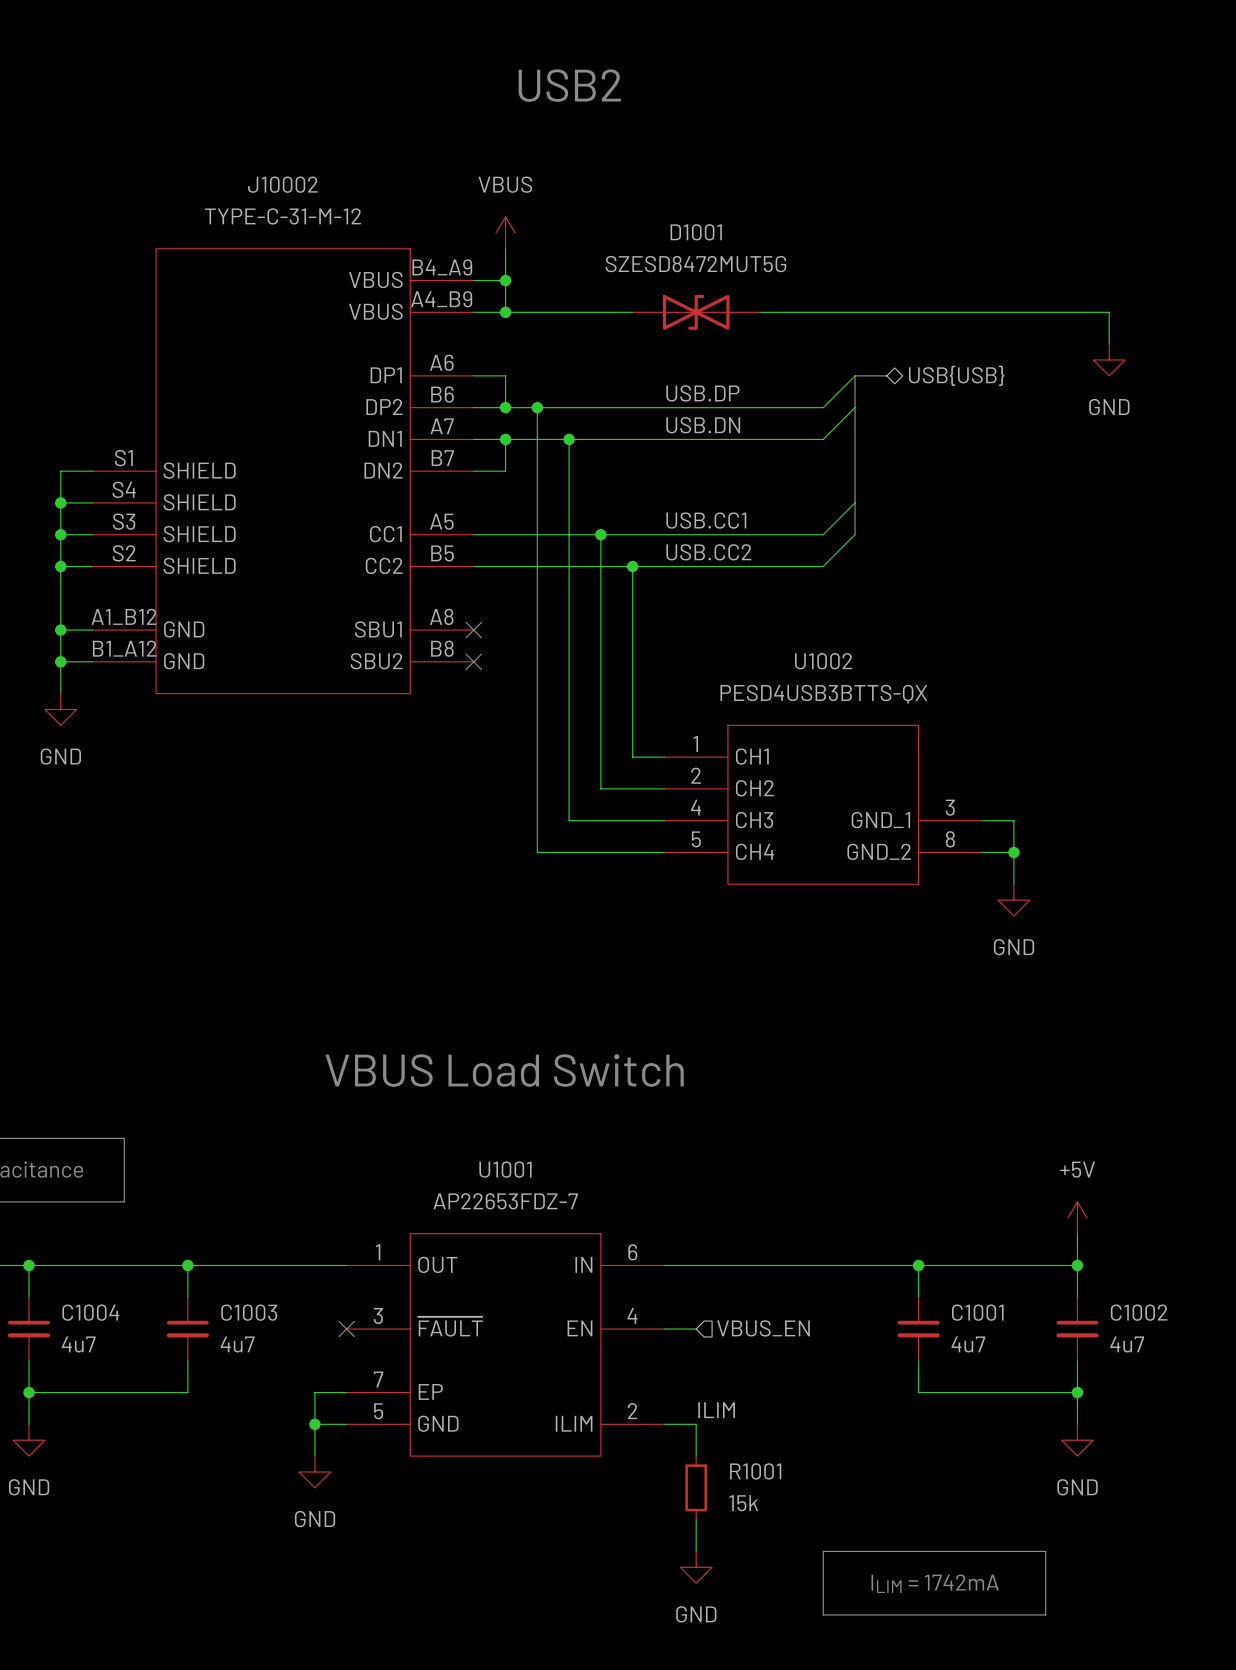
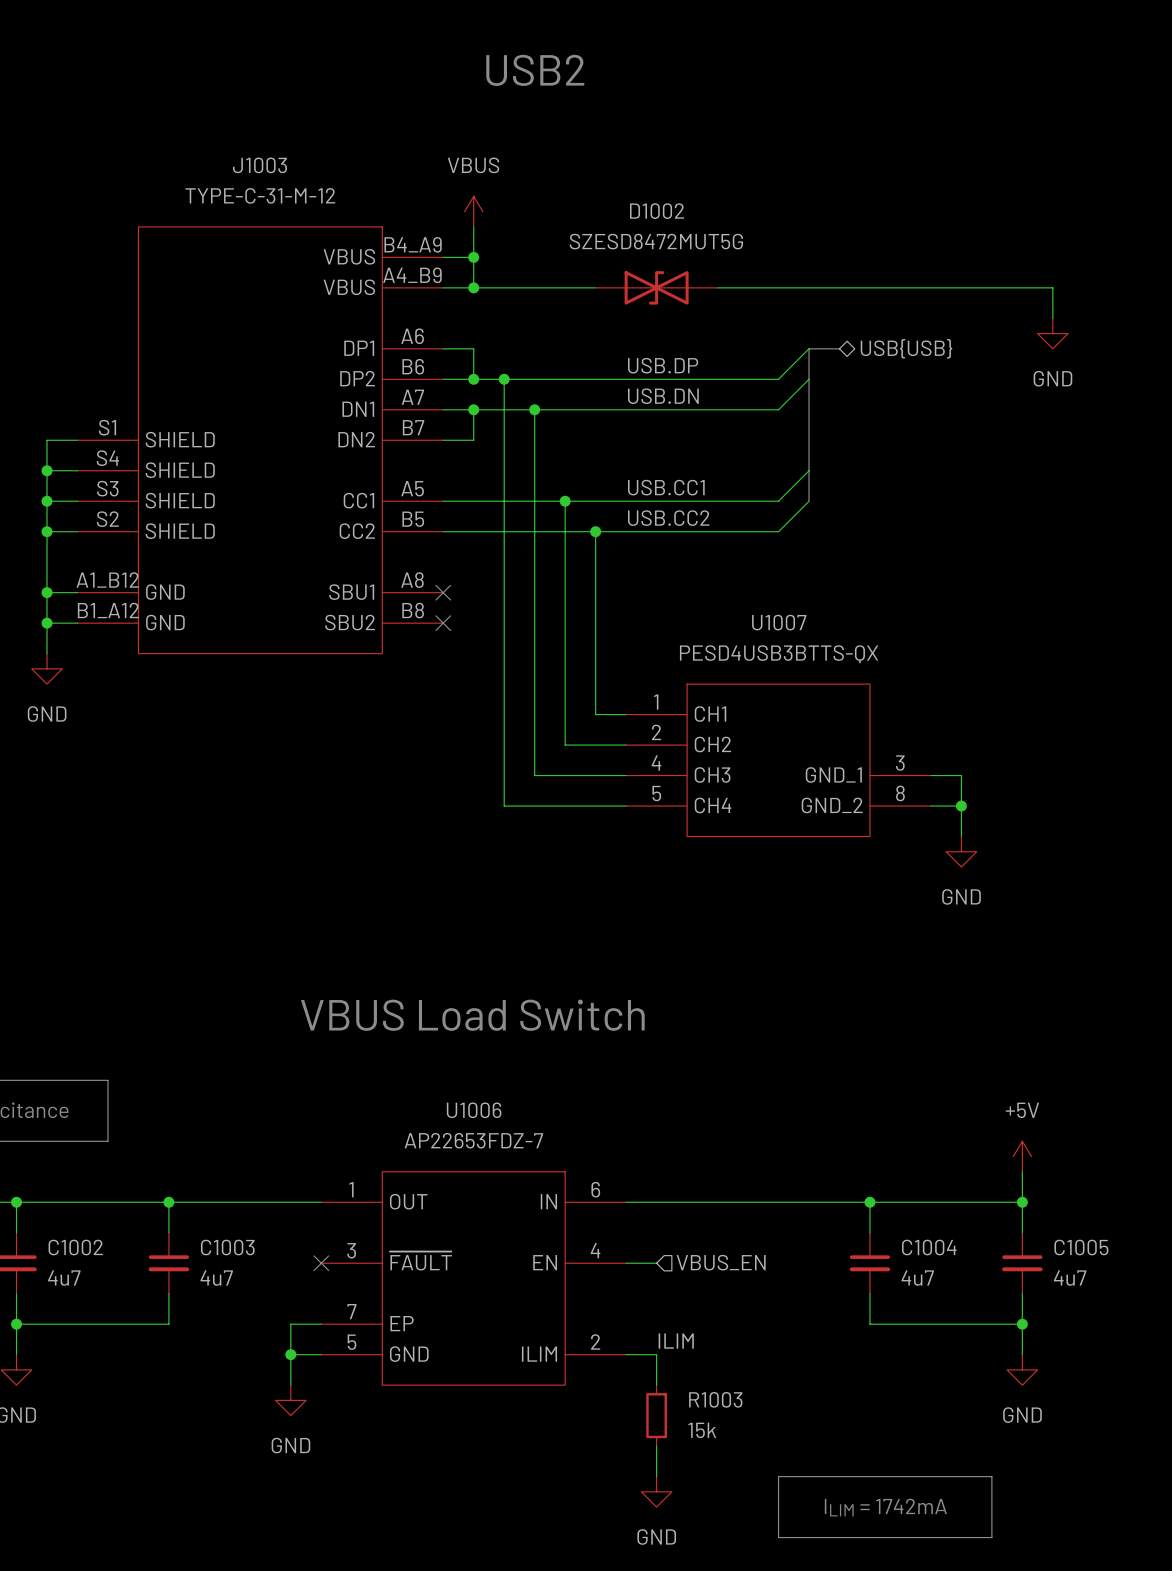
J10002 name: J10002 (282, 184) -> J1003 (259, 165)
D1001 name: D1001 (696, 232) -> D1002 (657, 211)
U1002 name: U1002 (823, 661) -> U1007 (779, 622)
U1001 name: U1001 (505, 1169) -> U1006 (474, 1110)
C1004 name: C1004 (90, 1312) -> C1002 (75, 1247)
C1001 name: C1001 (977, 1312) -> C1004 (929, 1247)
C1002 name: C1002 (1139, 1312) -> C1005 (1081, 1247)
R1001 name: R1001 (755, 1471) -> R1003 (715, 1399)

